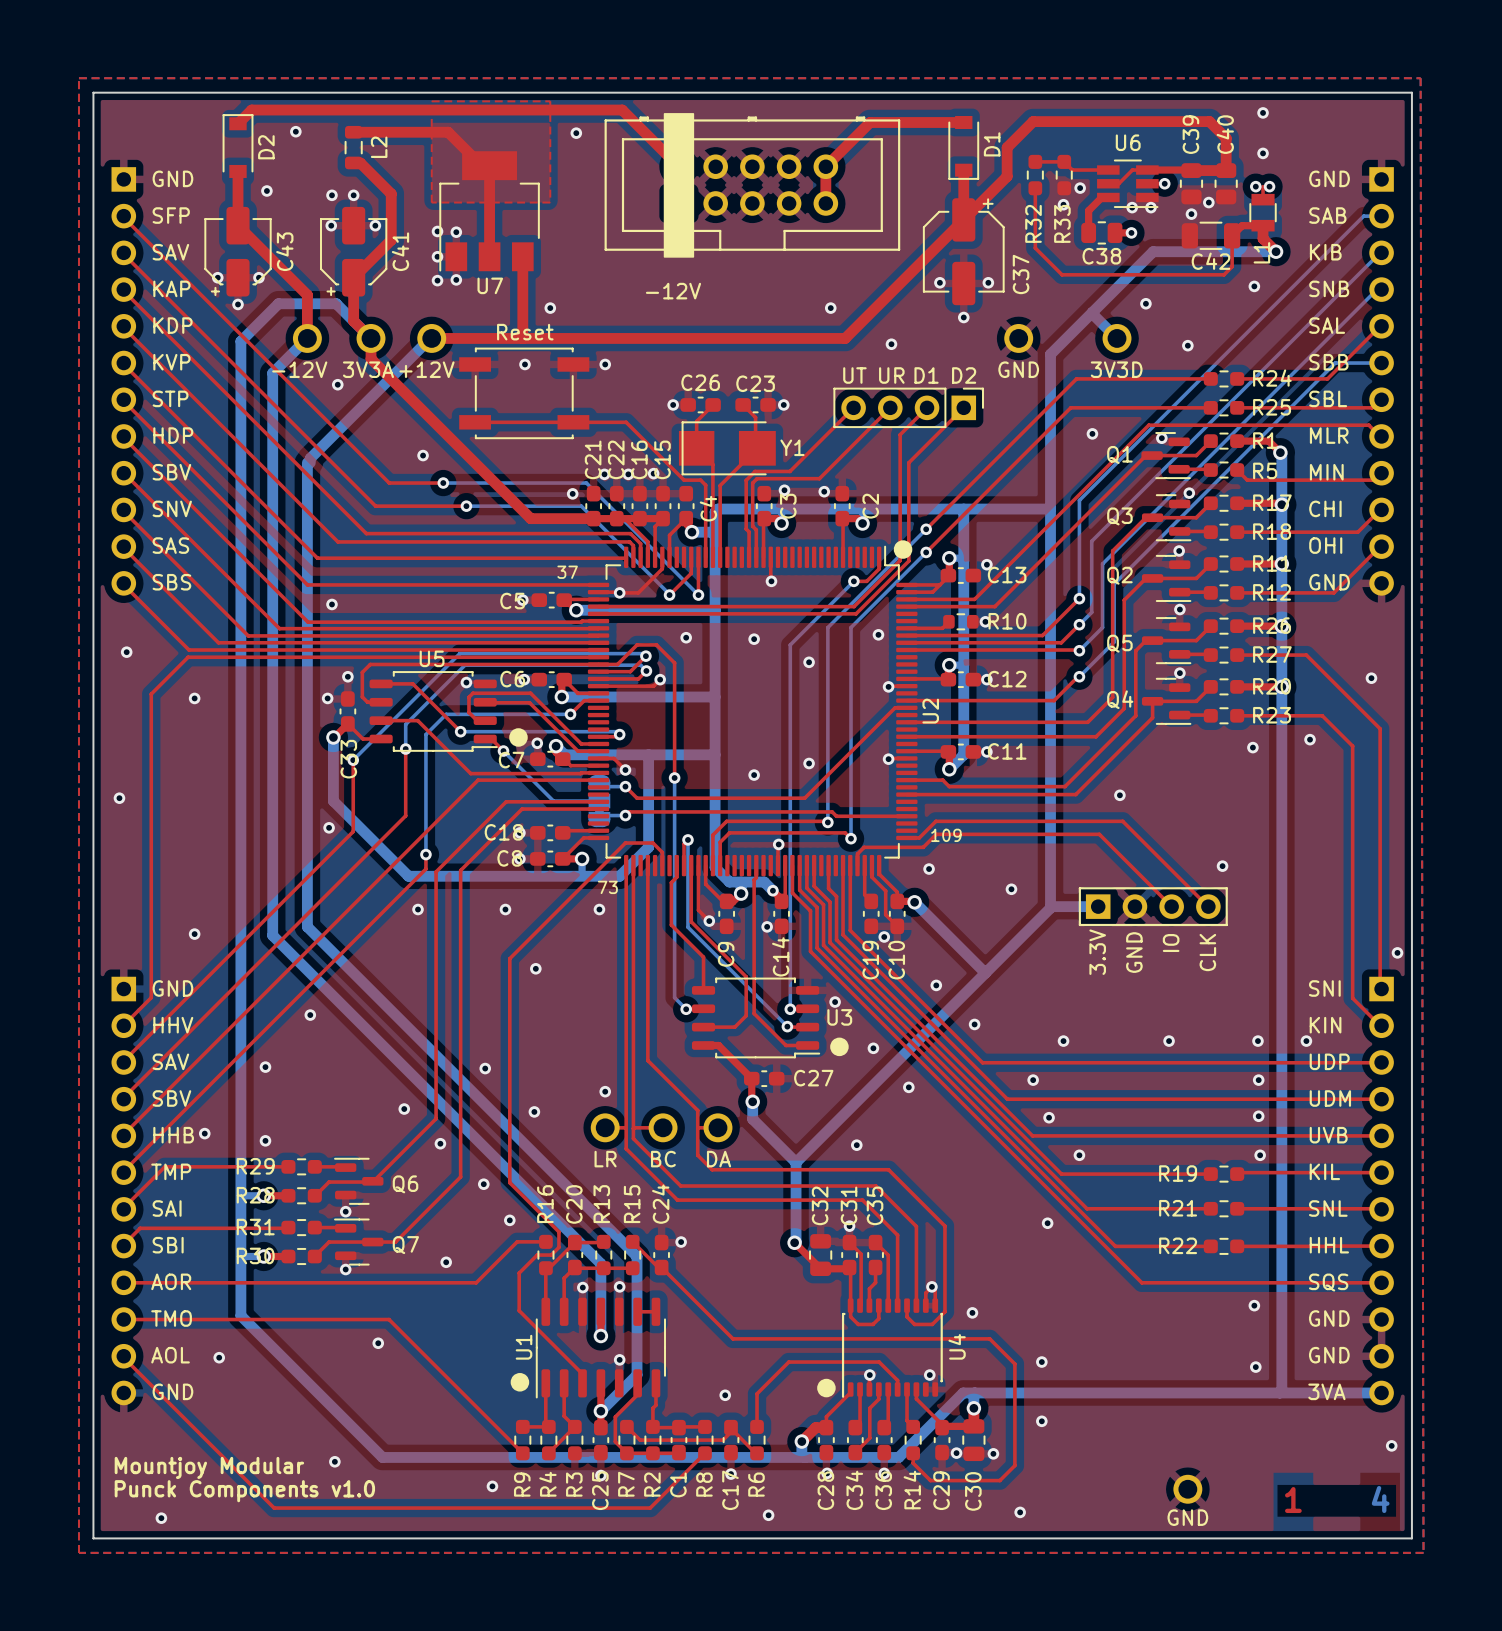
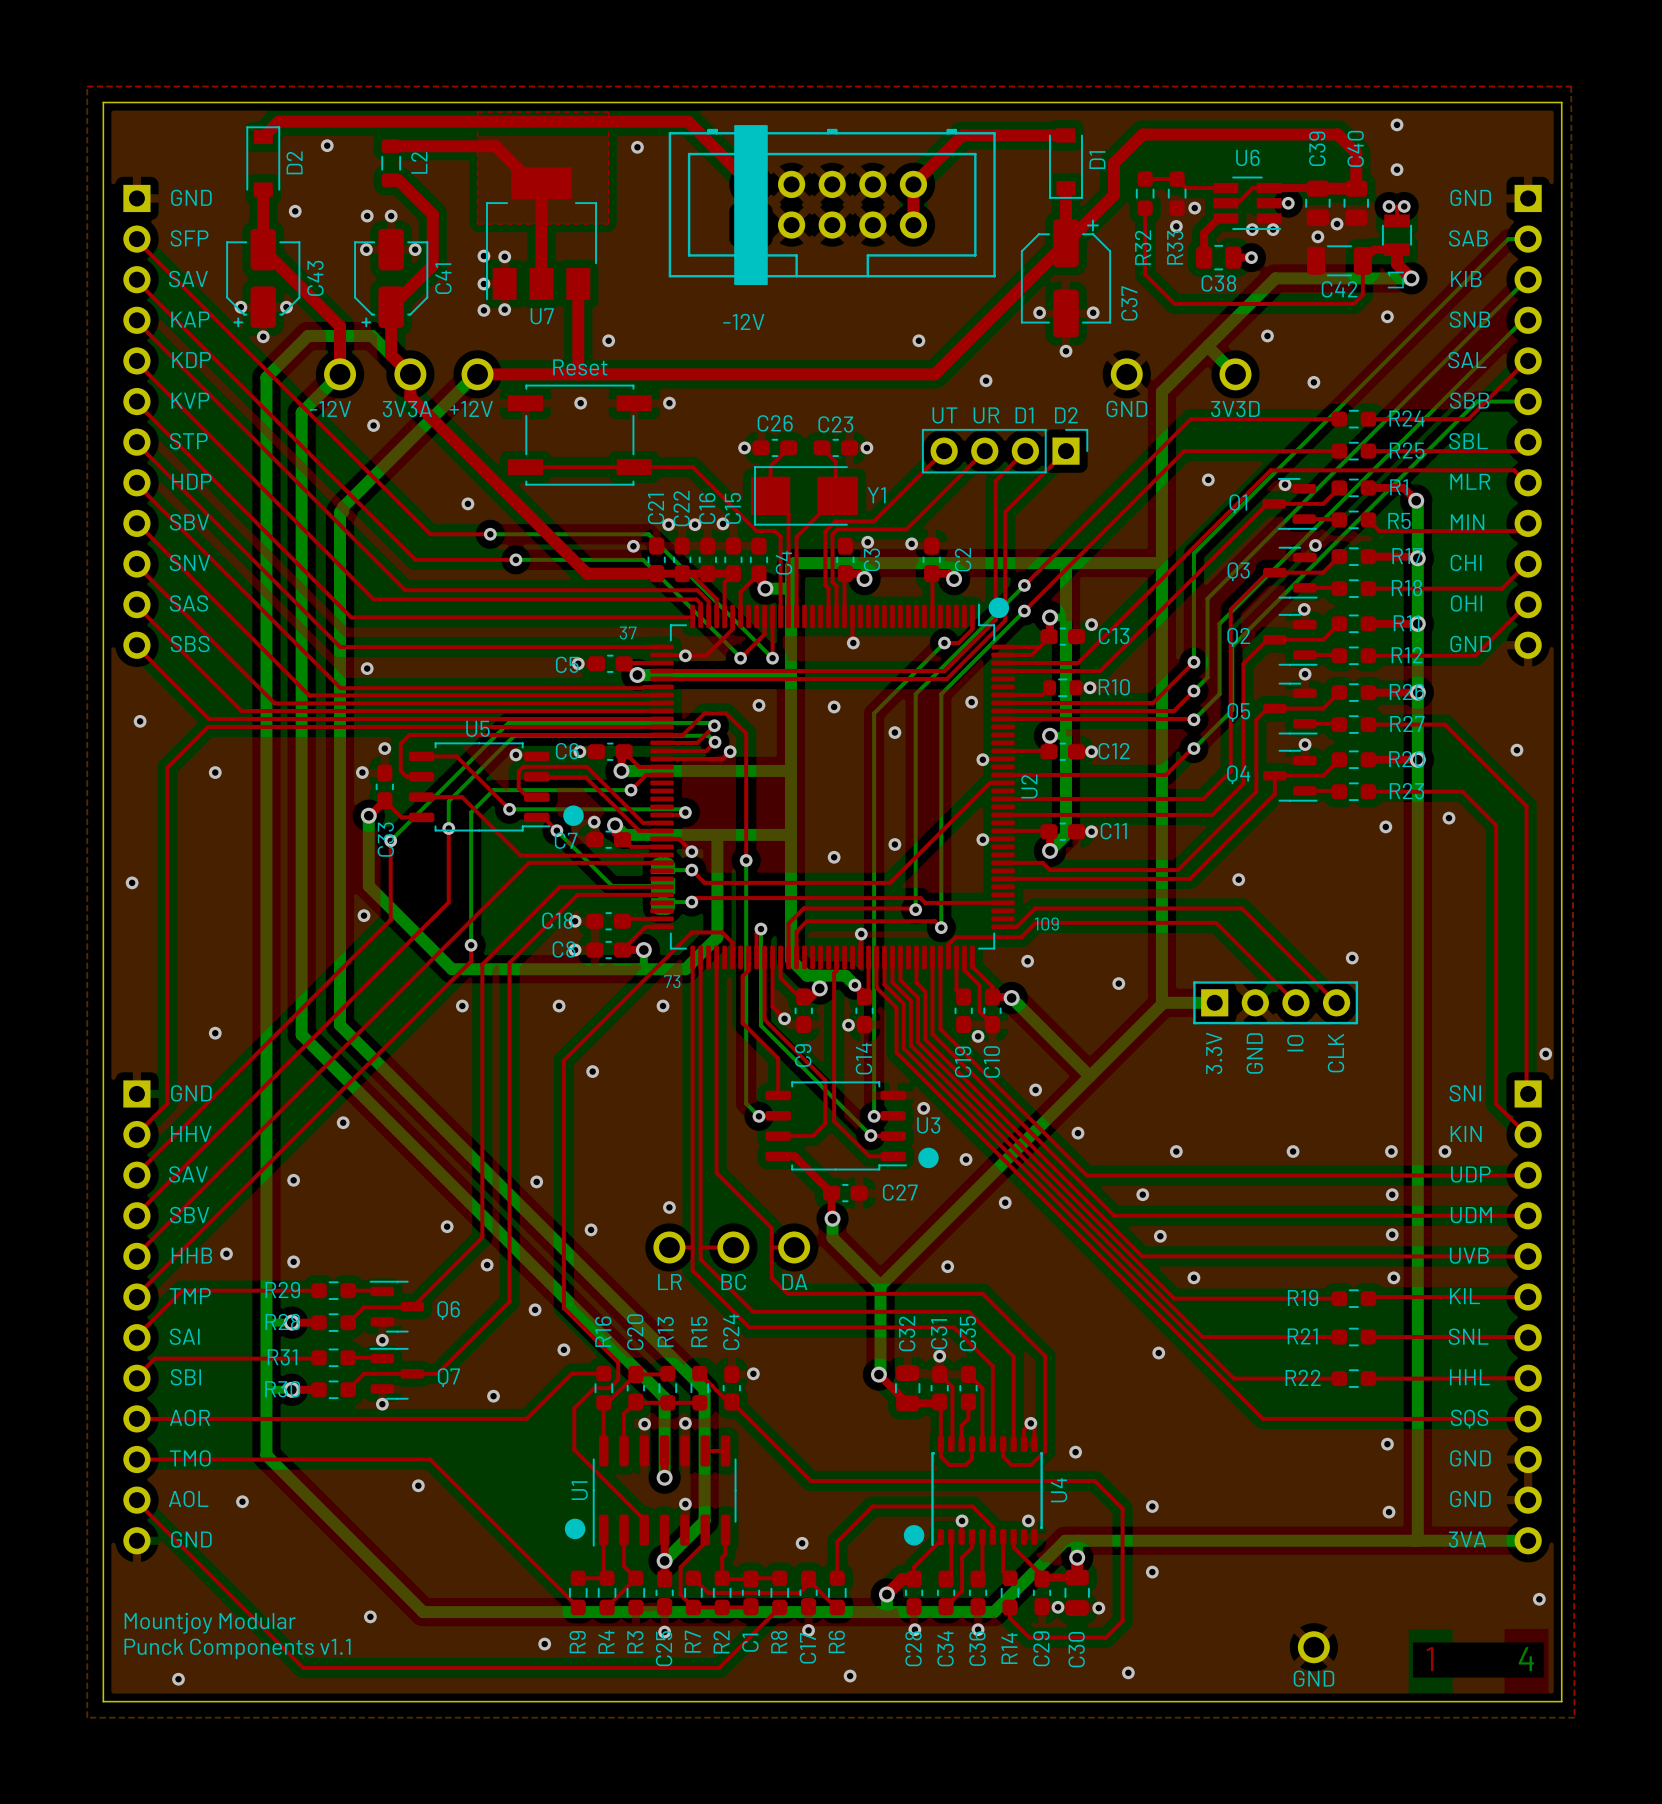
text: Punck Components v1.0 (244, 1491) -> Punck Components v1.1 (237, 1648)

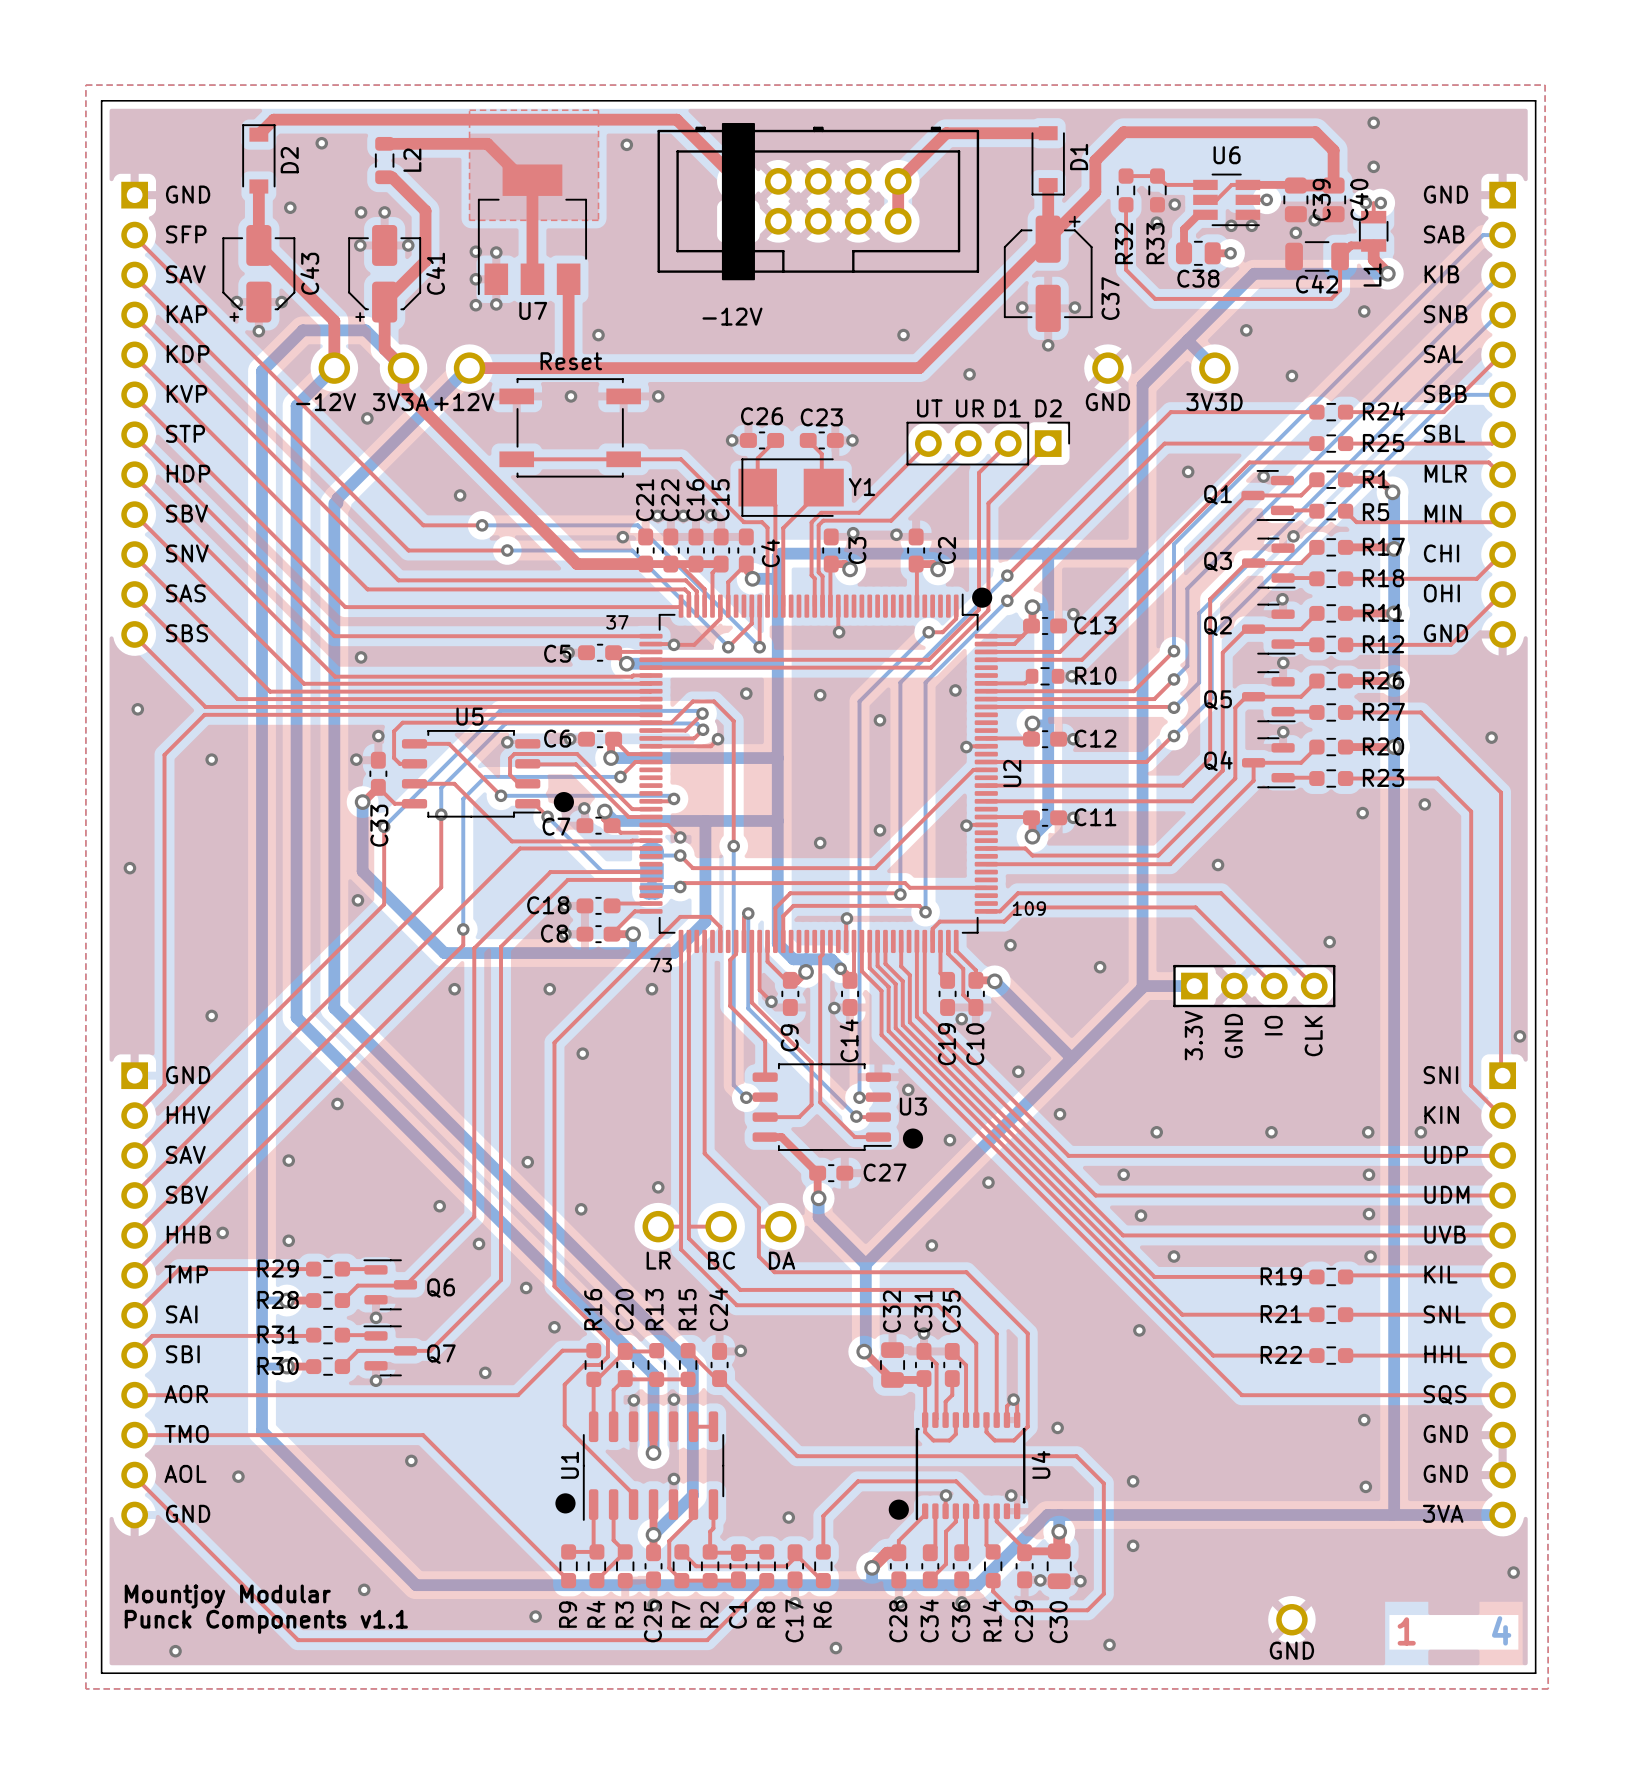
C39 name position: C39 (1317, 148) -> C39 (1321, 199)
C40 name position: C40 (1355, 148) -> C40 (1359, 199)

